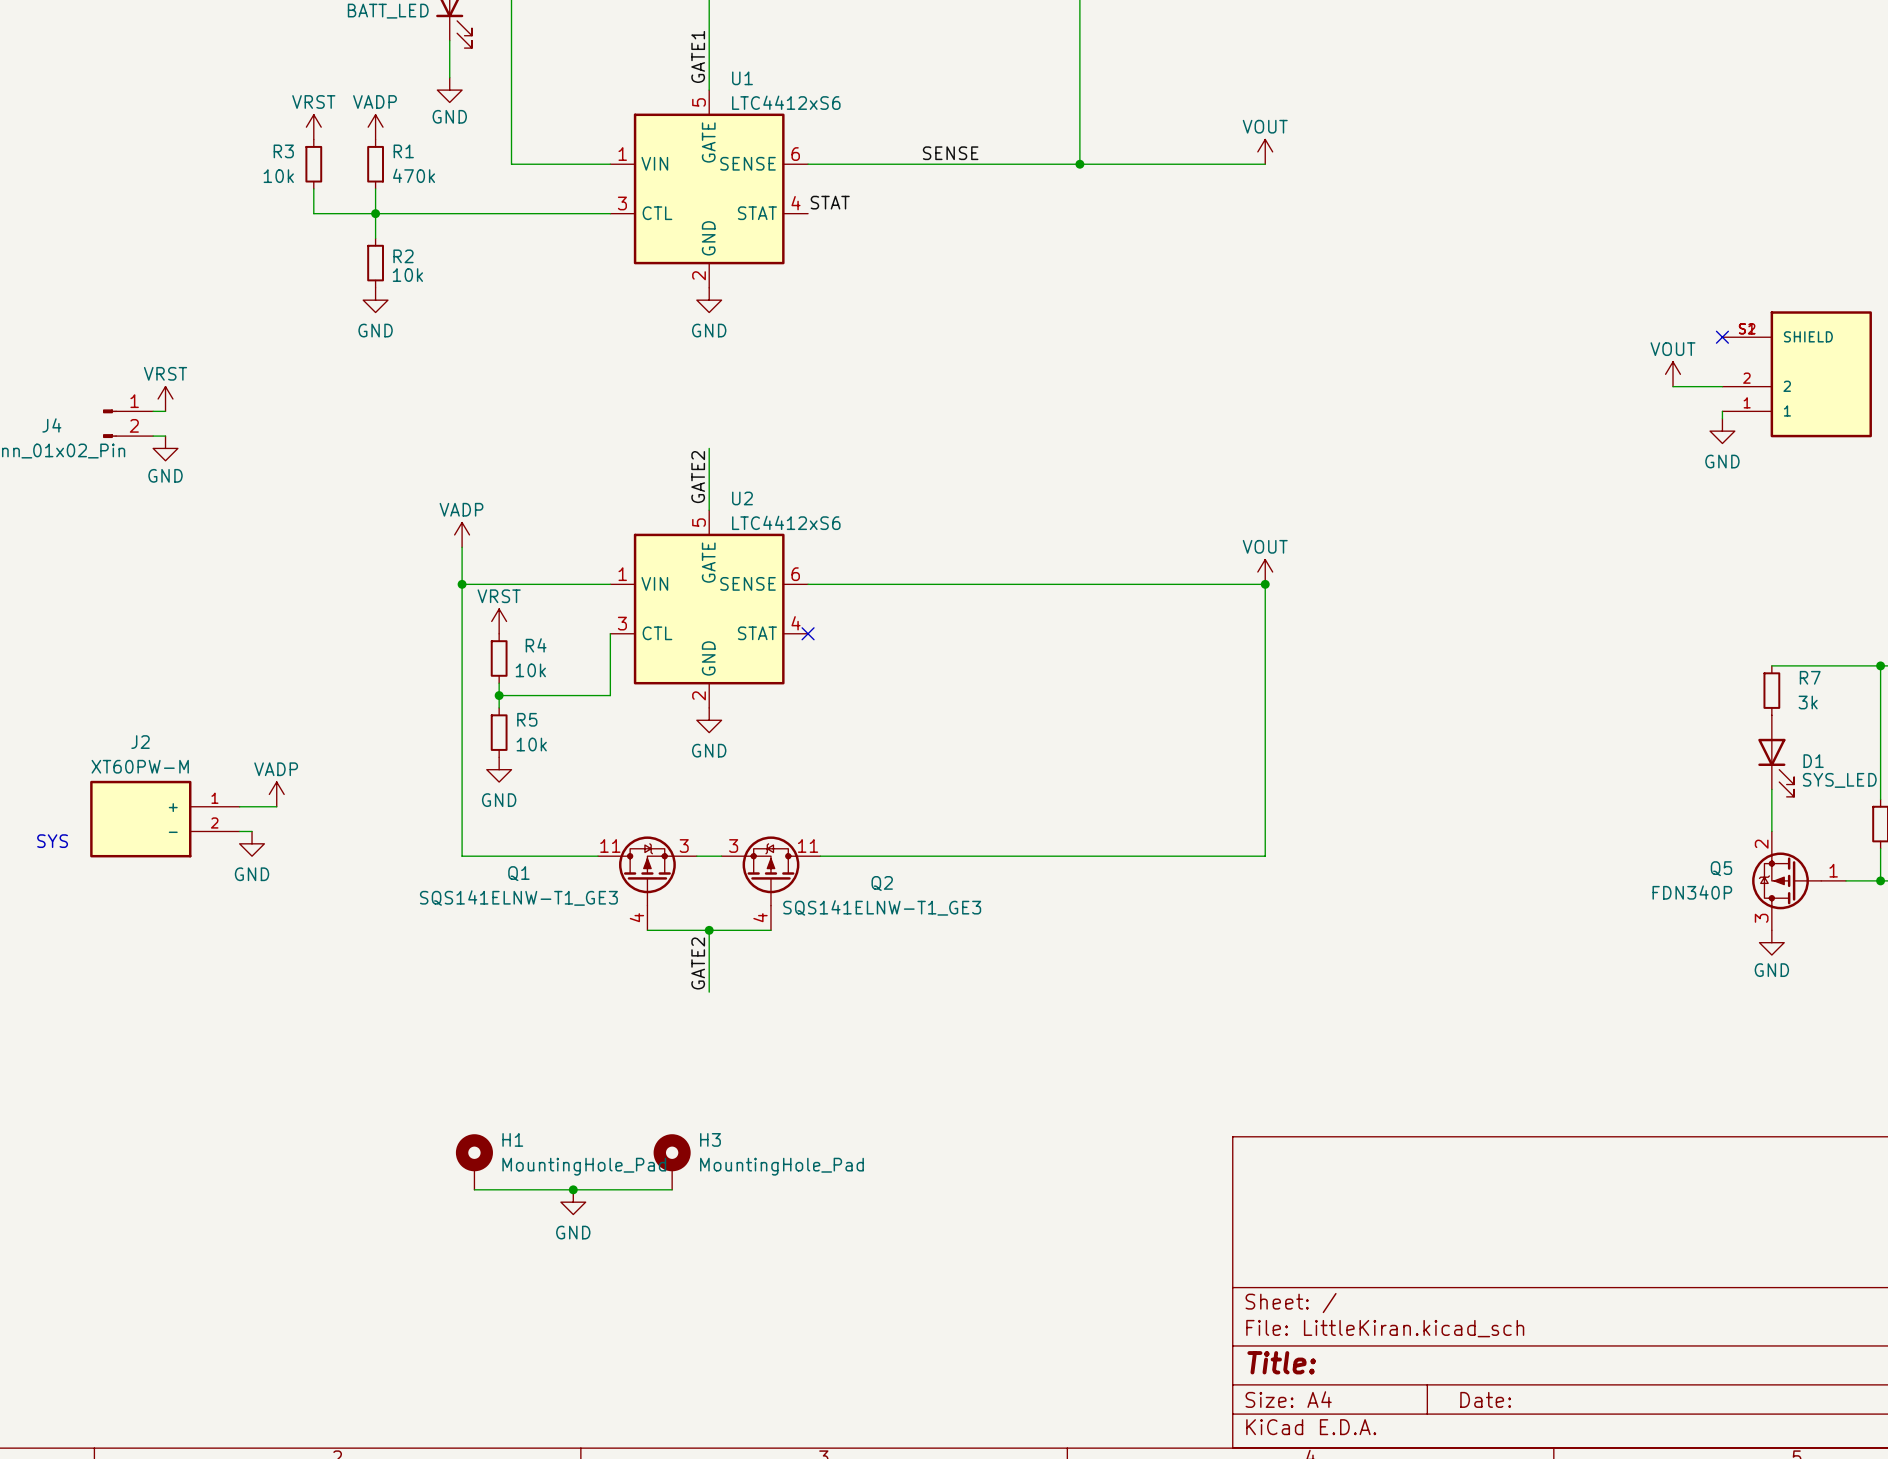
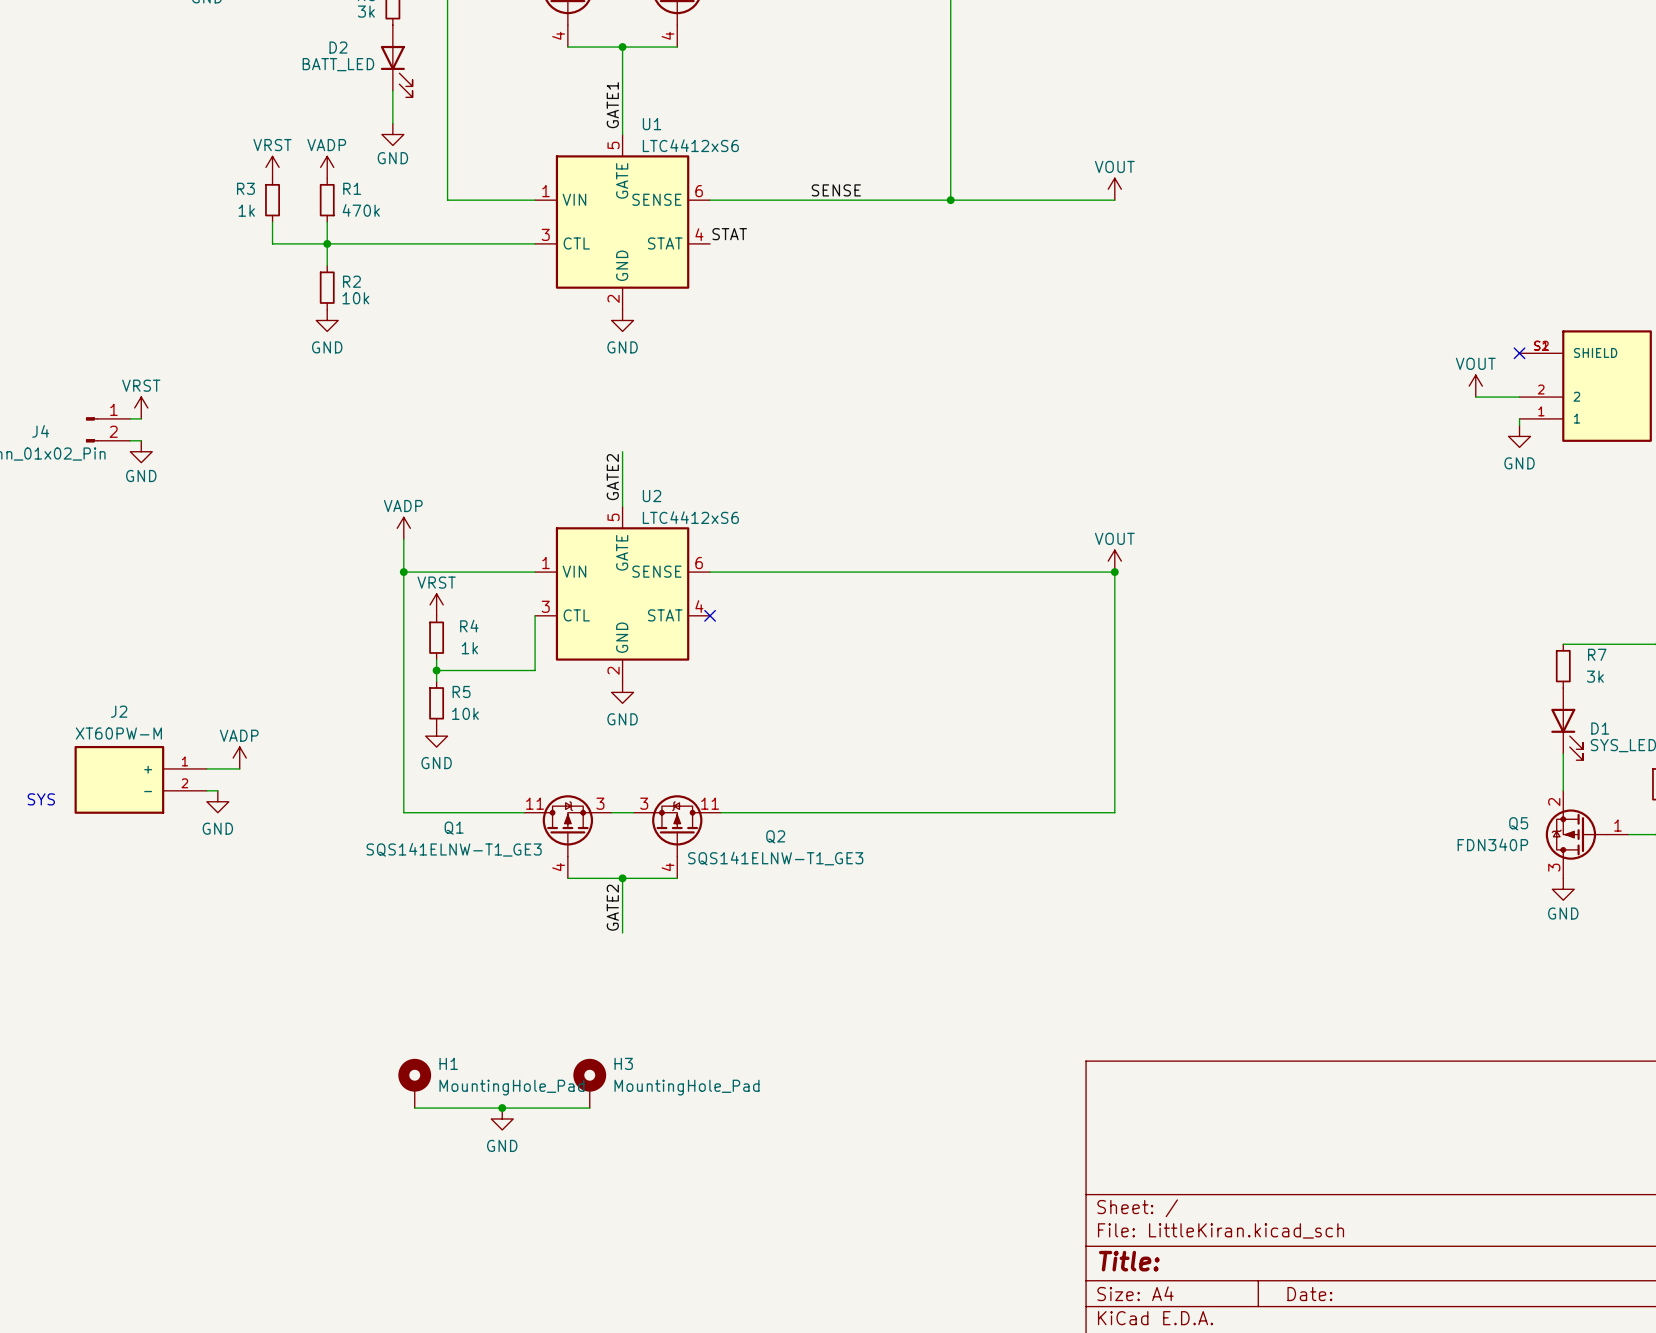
R3 value: 10k (278, 176) -> 1k (246, 210)
R4 value: 10k (530, 670) -> 1k (469, 648)

